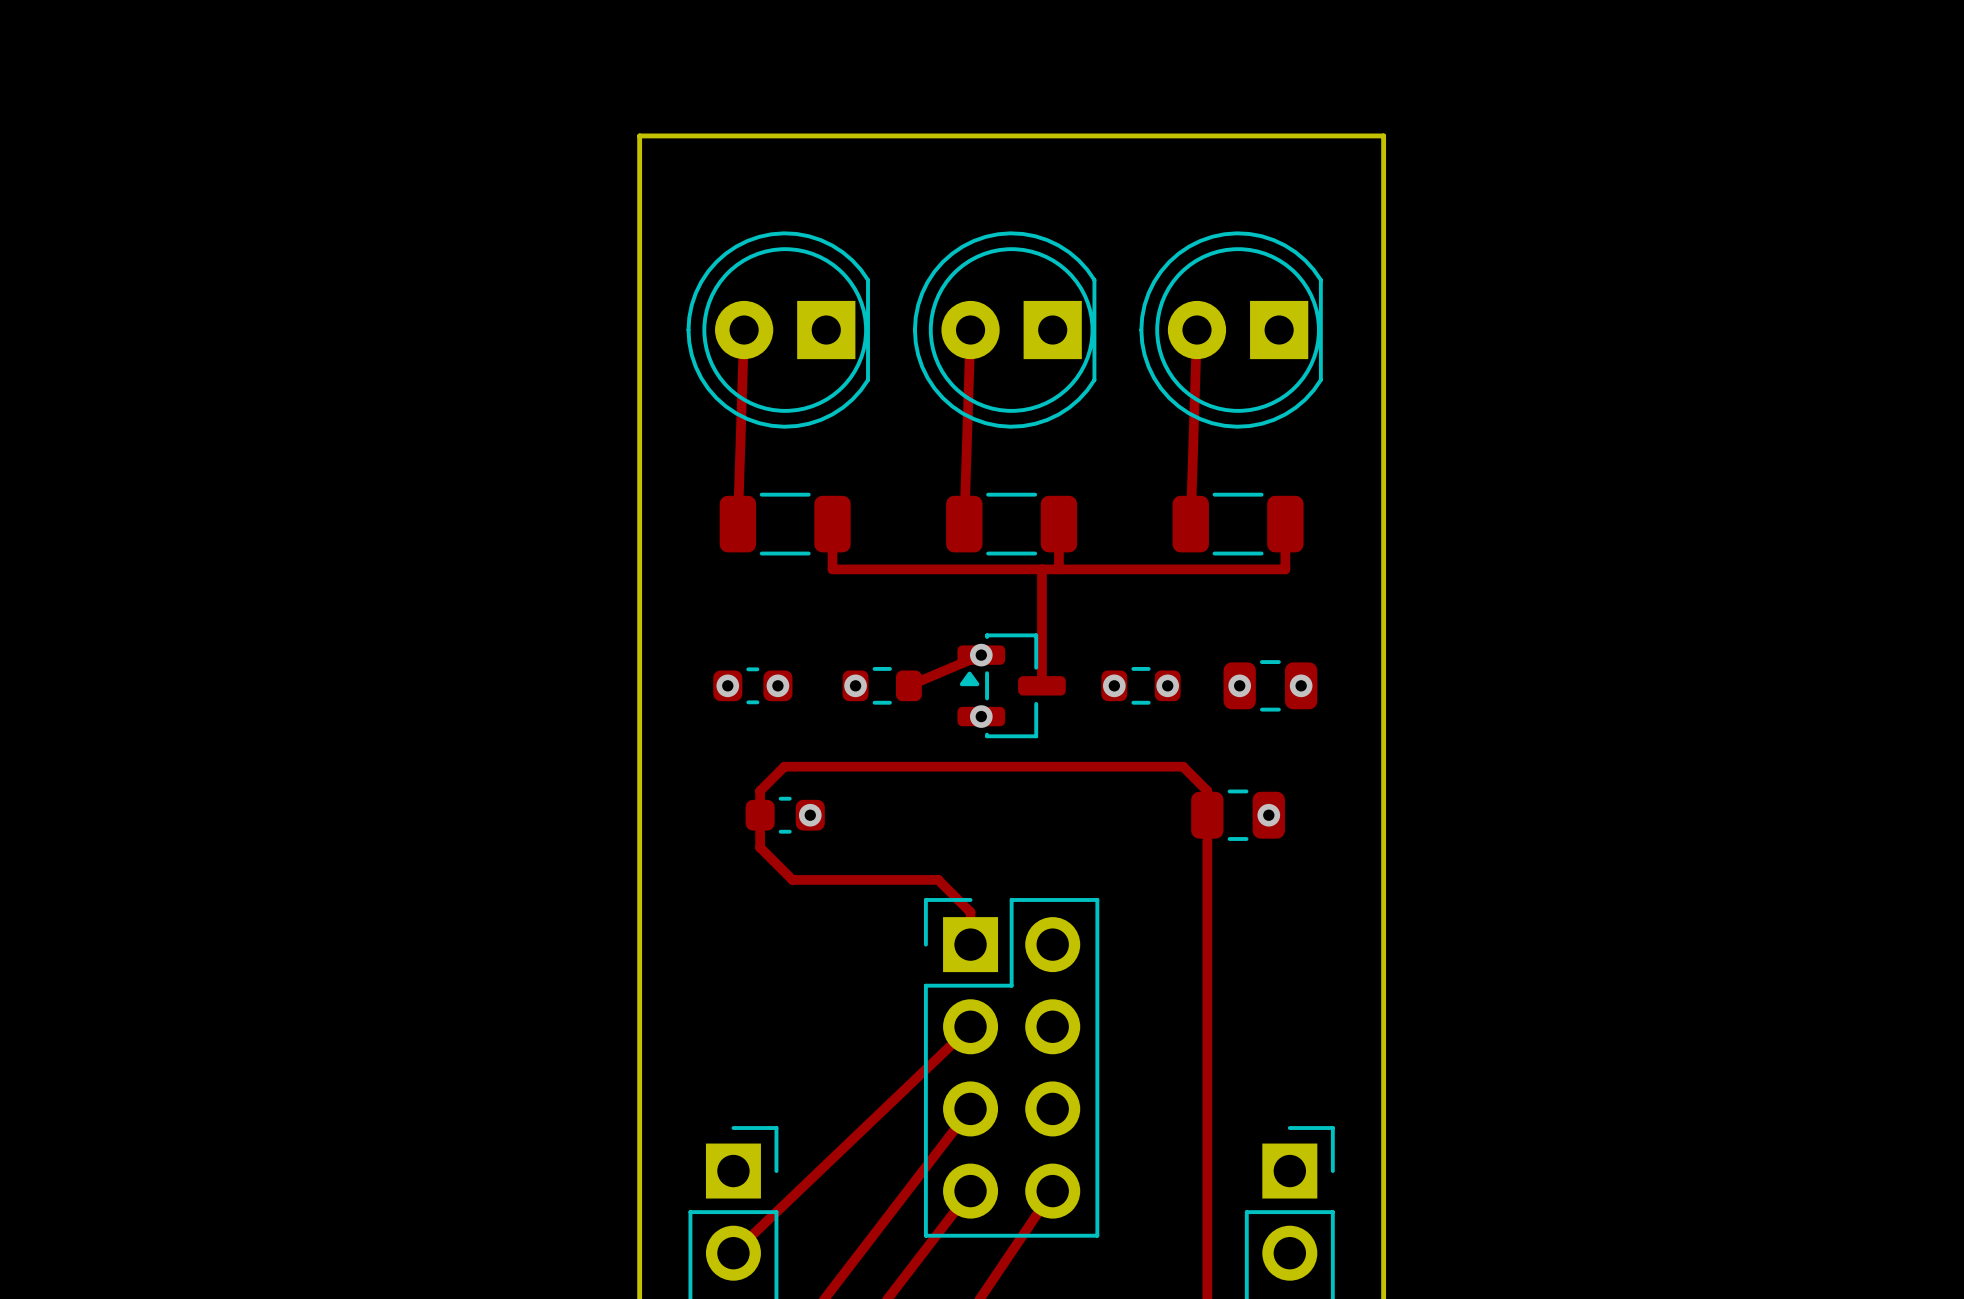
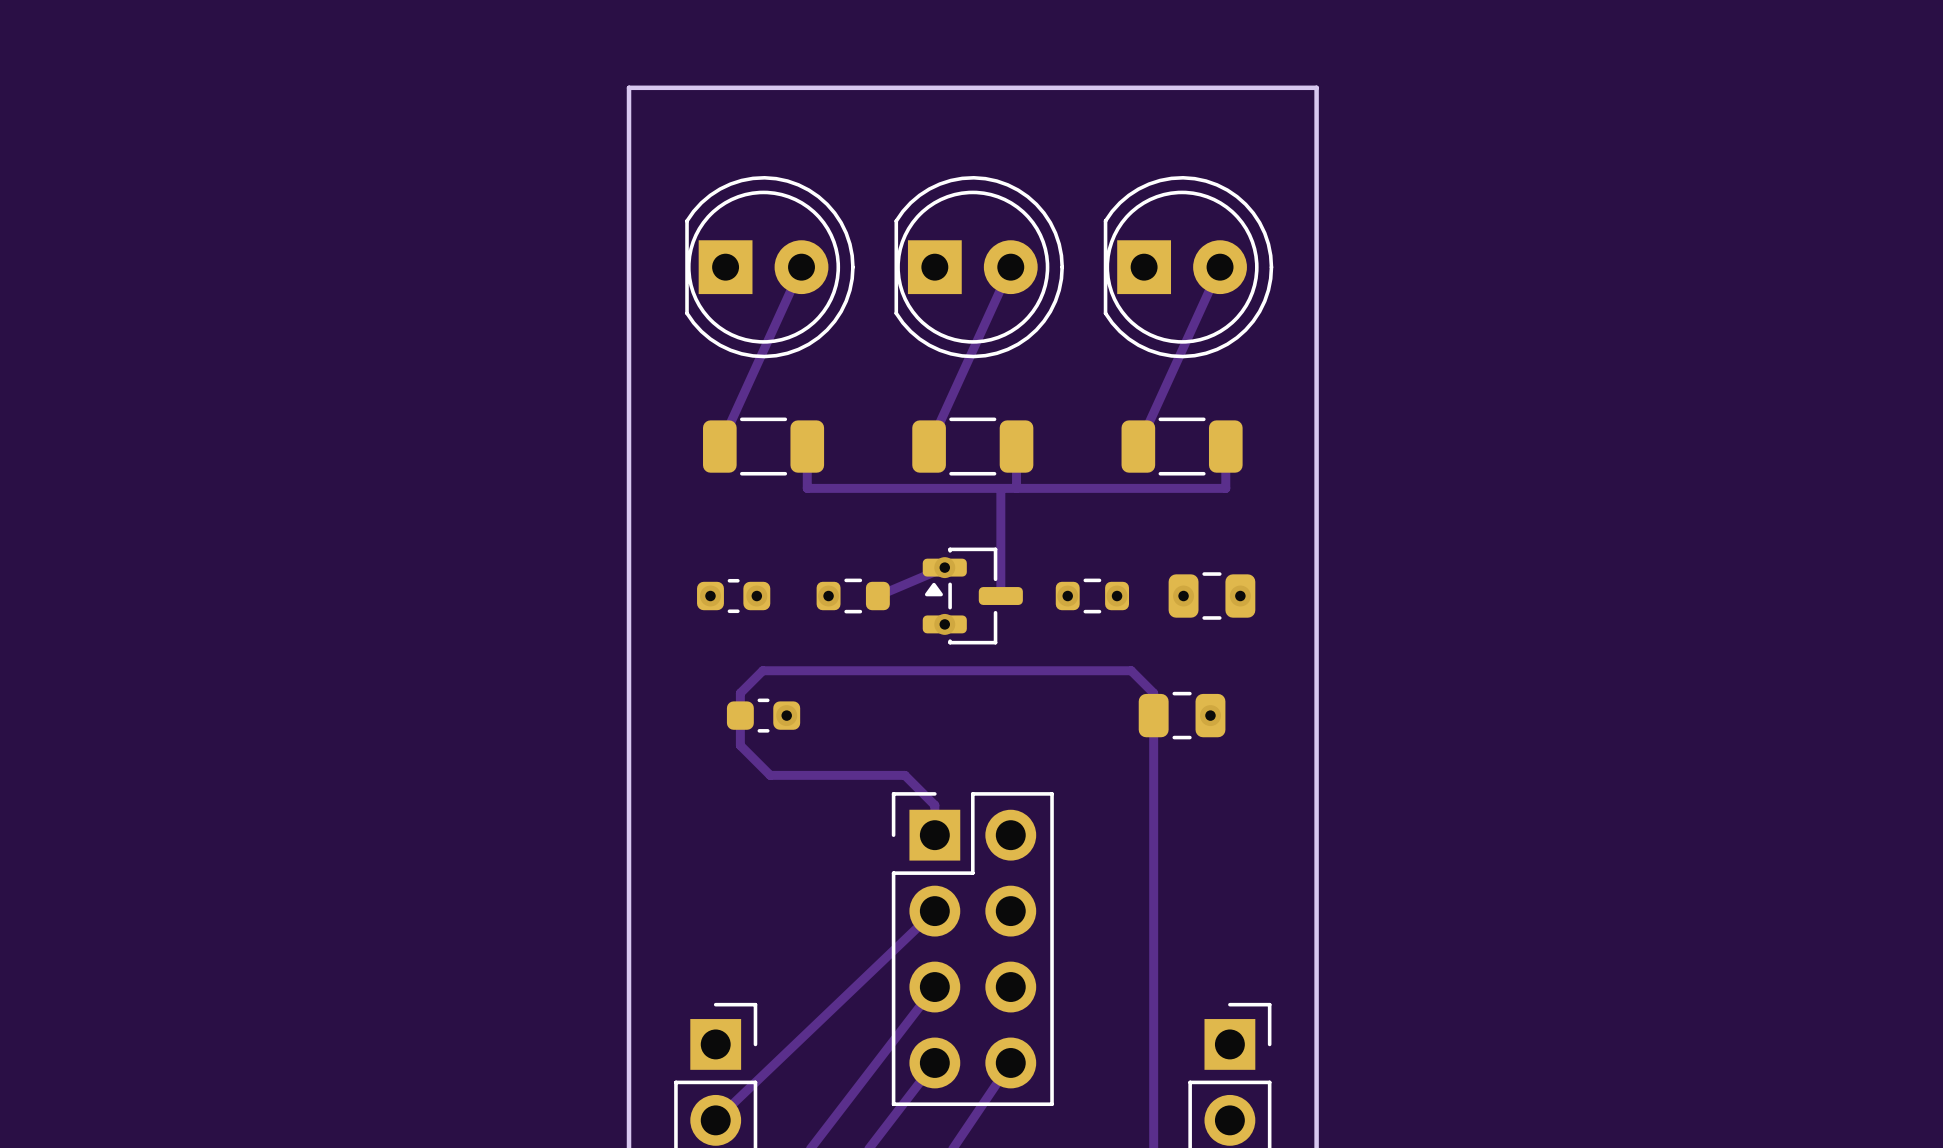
track: (744, 330) (737, 524) -> (801, 267) (719, 446)
part rotation: 0° (778, 330) -> 180° (769, 267)
track: (970, 330) (964, 524) -> (1010, 267) (929, 446)
part rotation: 0° (1004, 330) -> 180° (979, 267)
track: (1196, 330) (1190, 524) -> (1220, 267) (1138, 446)
part rotation: 0° (1231, 330) -> 180° (1188, 267)

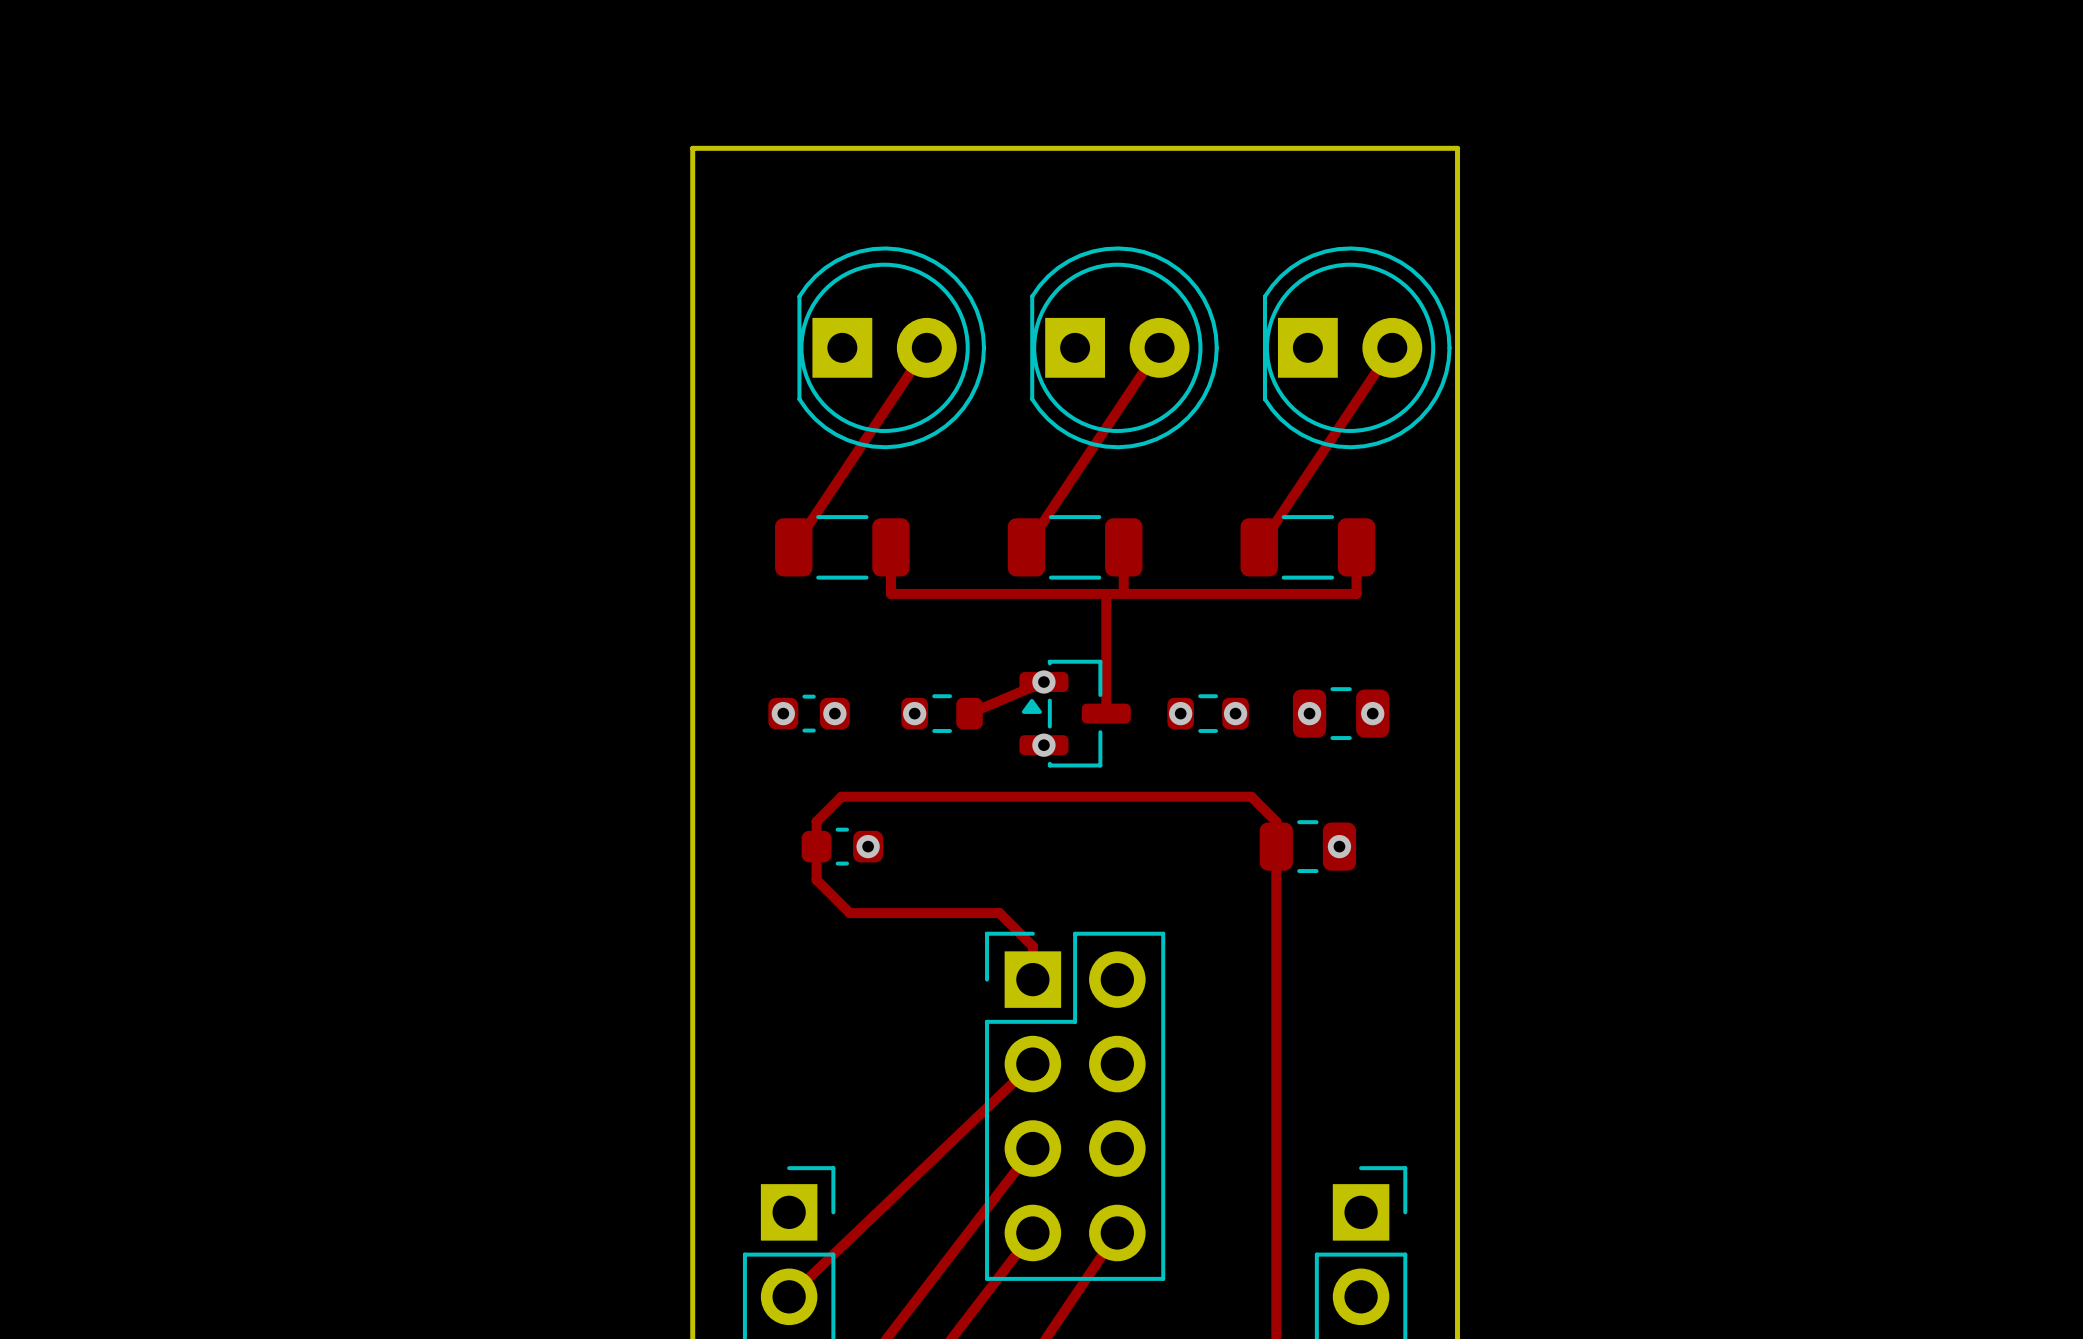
part position: (769, 267) -> (891, 347)
track: (801, 267) (719, 446) -> (926, 347) (793, 547)
part position: (979, 267) -> (1124, 347)
track: (1010, 267) (929, 446) -> (1159, 347) (1026, 547)
part position: (1188, 267) -> (1357, 347)
track: (1220, 267) (1138, 446) -> (1392, 347) (1259, 547)

